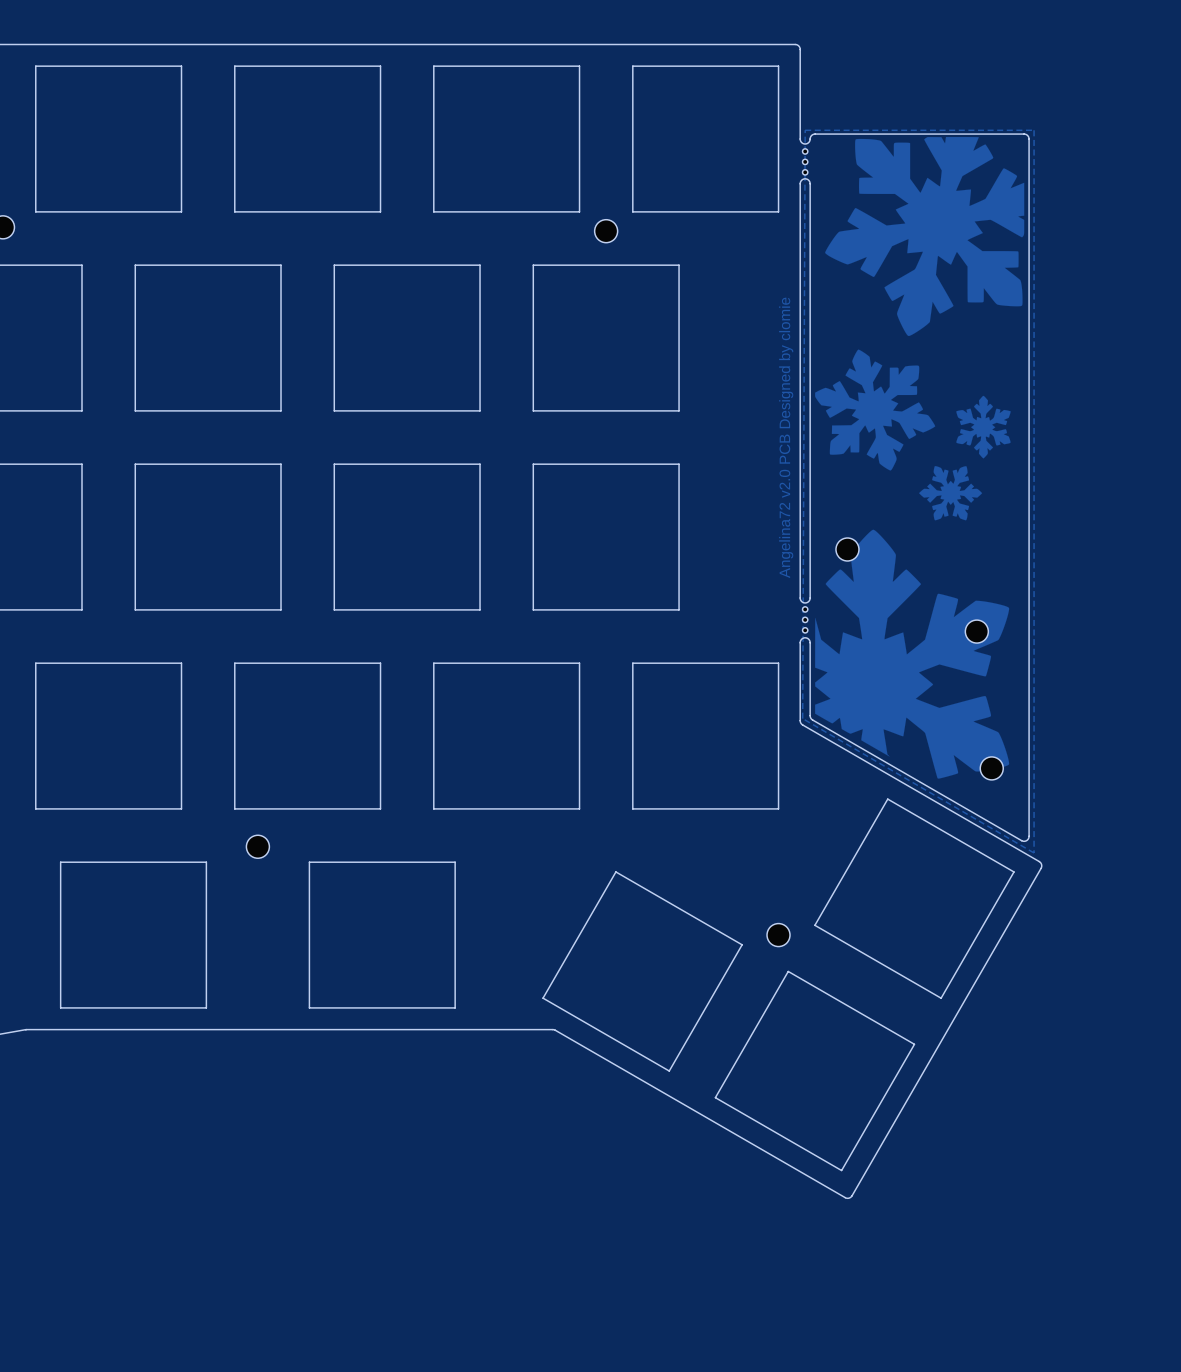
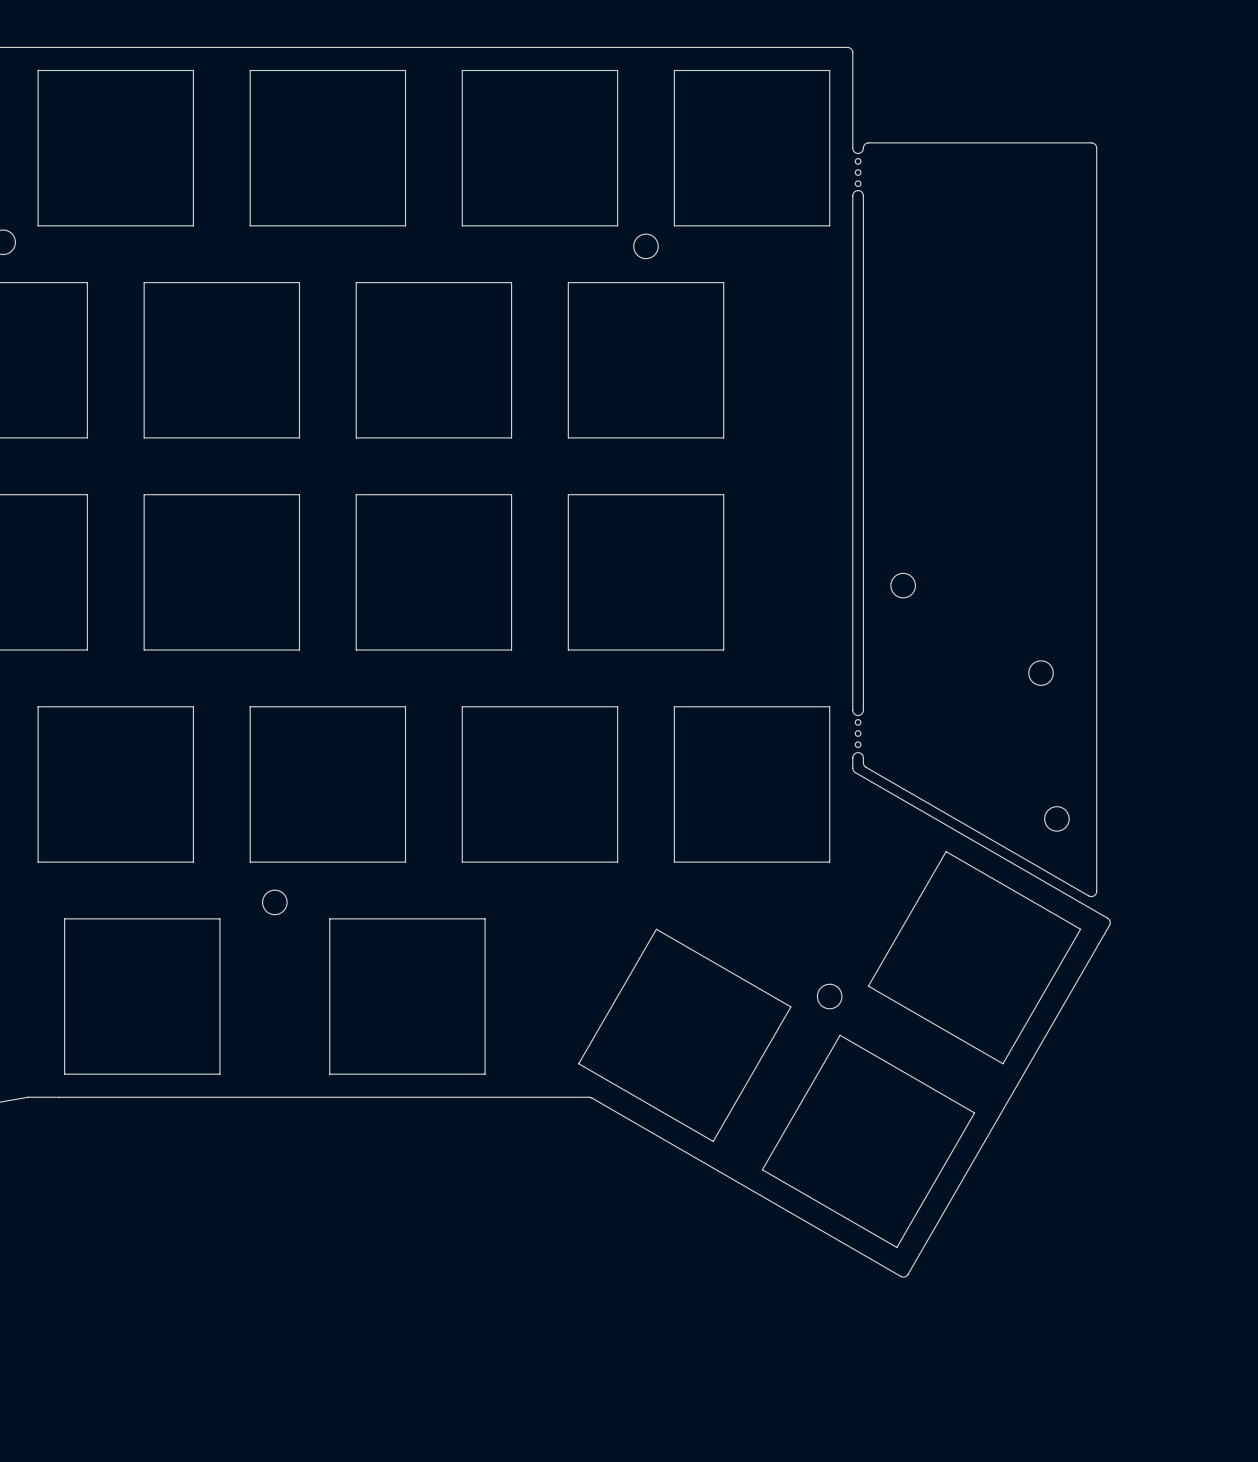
zone outline: (805, 130) (1034, 130) (1034, 852) (802, 718) (805, 130) -> none
drawing: [815, 136, 1025, 779] -> none
drawing: [779, 297, 794, 579] -> none
board edge: (800, 597) (805, 602) (810, 598) -> (863, 685) (863, 637)
board edge: none -> (852, 637) (852, 710) (858, 715) (861, 713) (863, 710)
part position: (805, 619) -> (858, 733)
round board edge: none -> [1028, 660, 1054, 686]
part: (976, 631) -> none
board edge: (810, 642) (805, 637) (800, 642) (800, 720) -> none
board edge: (810, 666) (810, 715) -> (852, 768) (852, 757) (855, 753) (862, 754) (863, 762)

